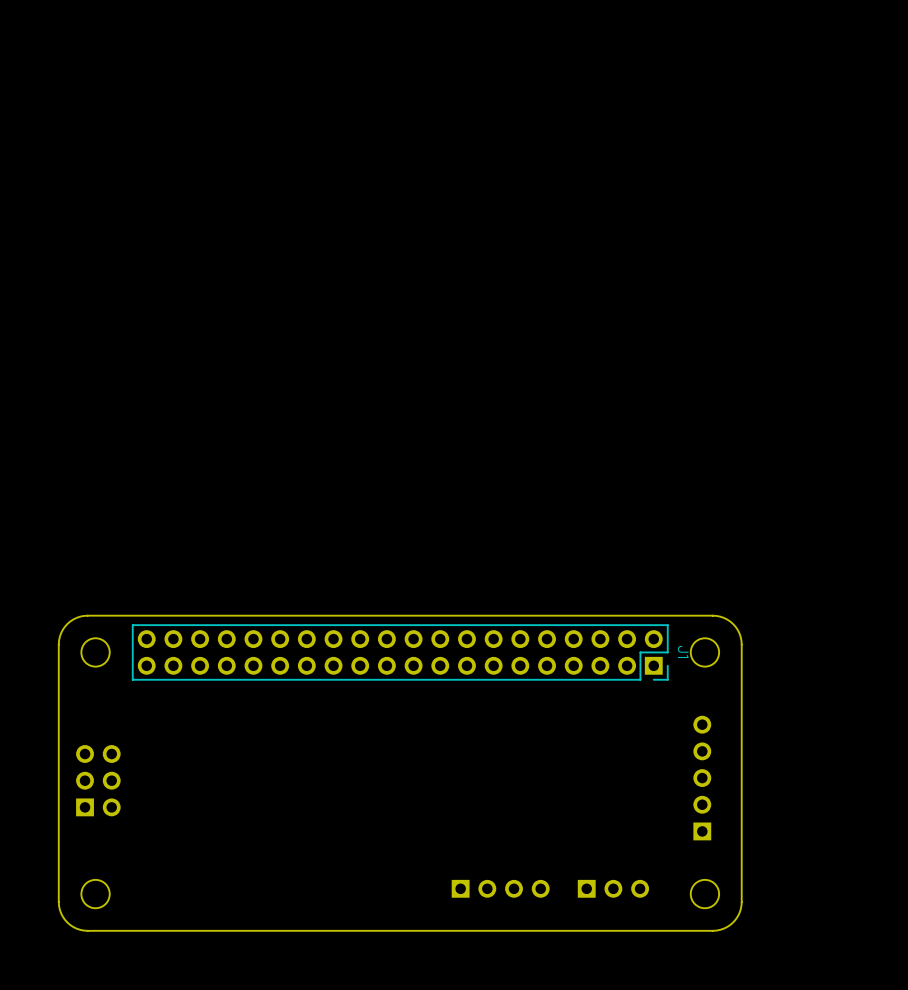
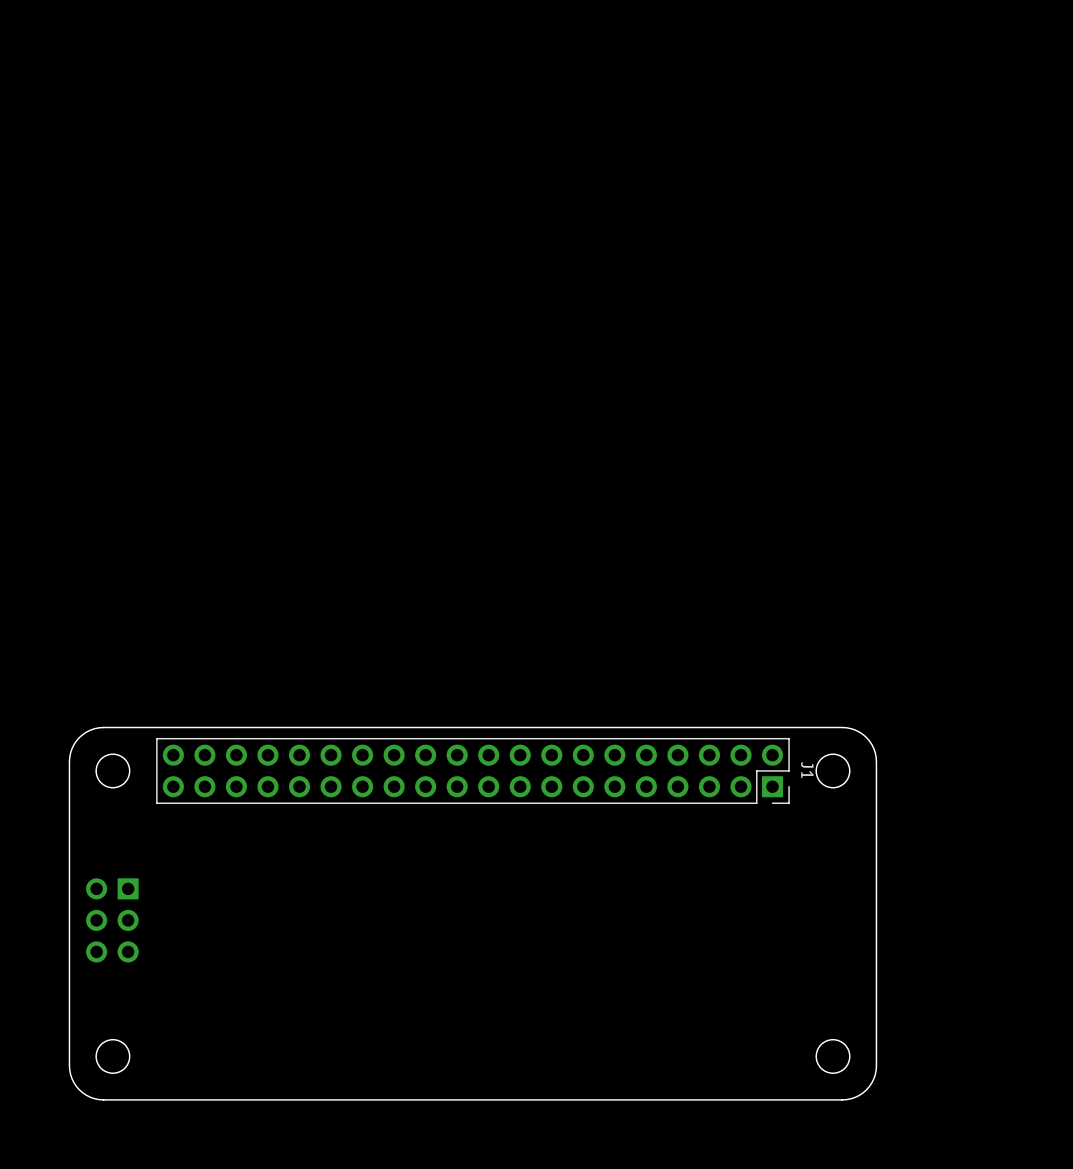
part: (702, 778) -> none
part rotation: 0° (98, 780) -> 180° (112, 920)
part: (500, 888) -> none
part: (613, 888) -> none

